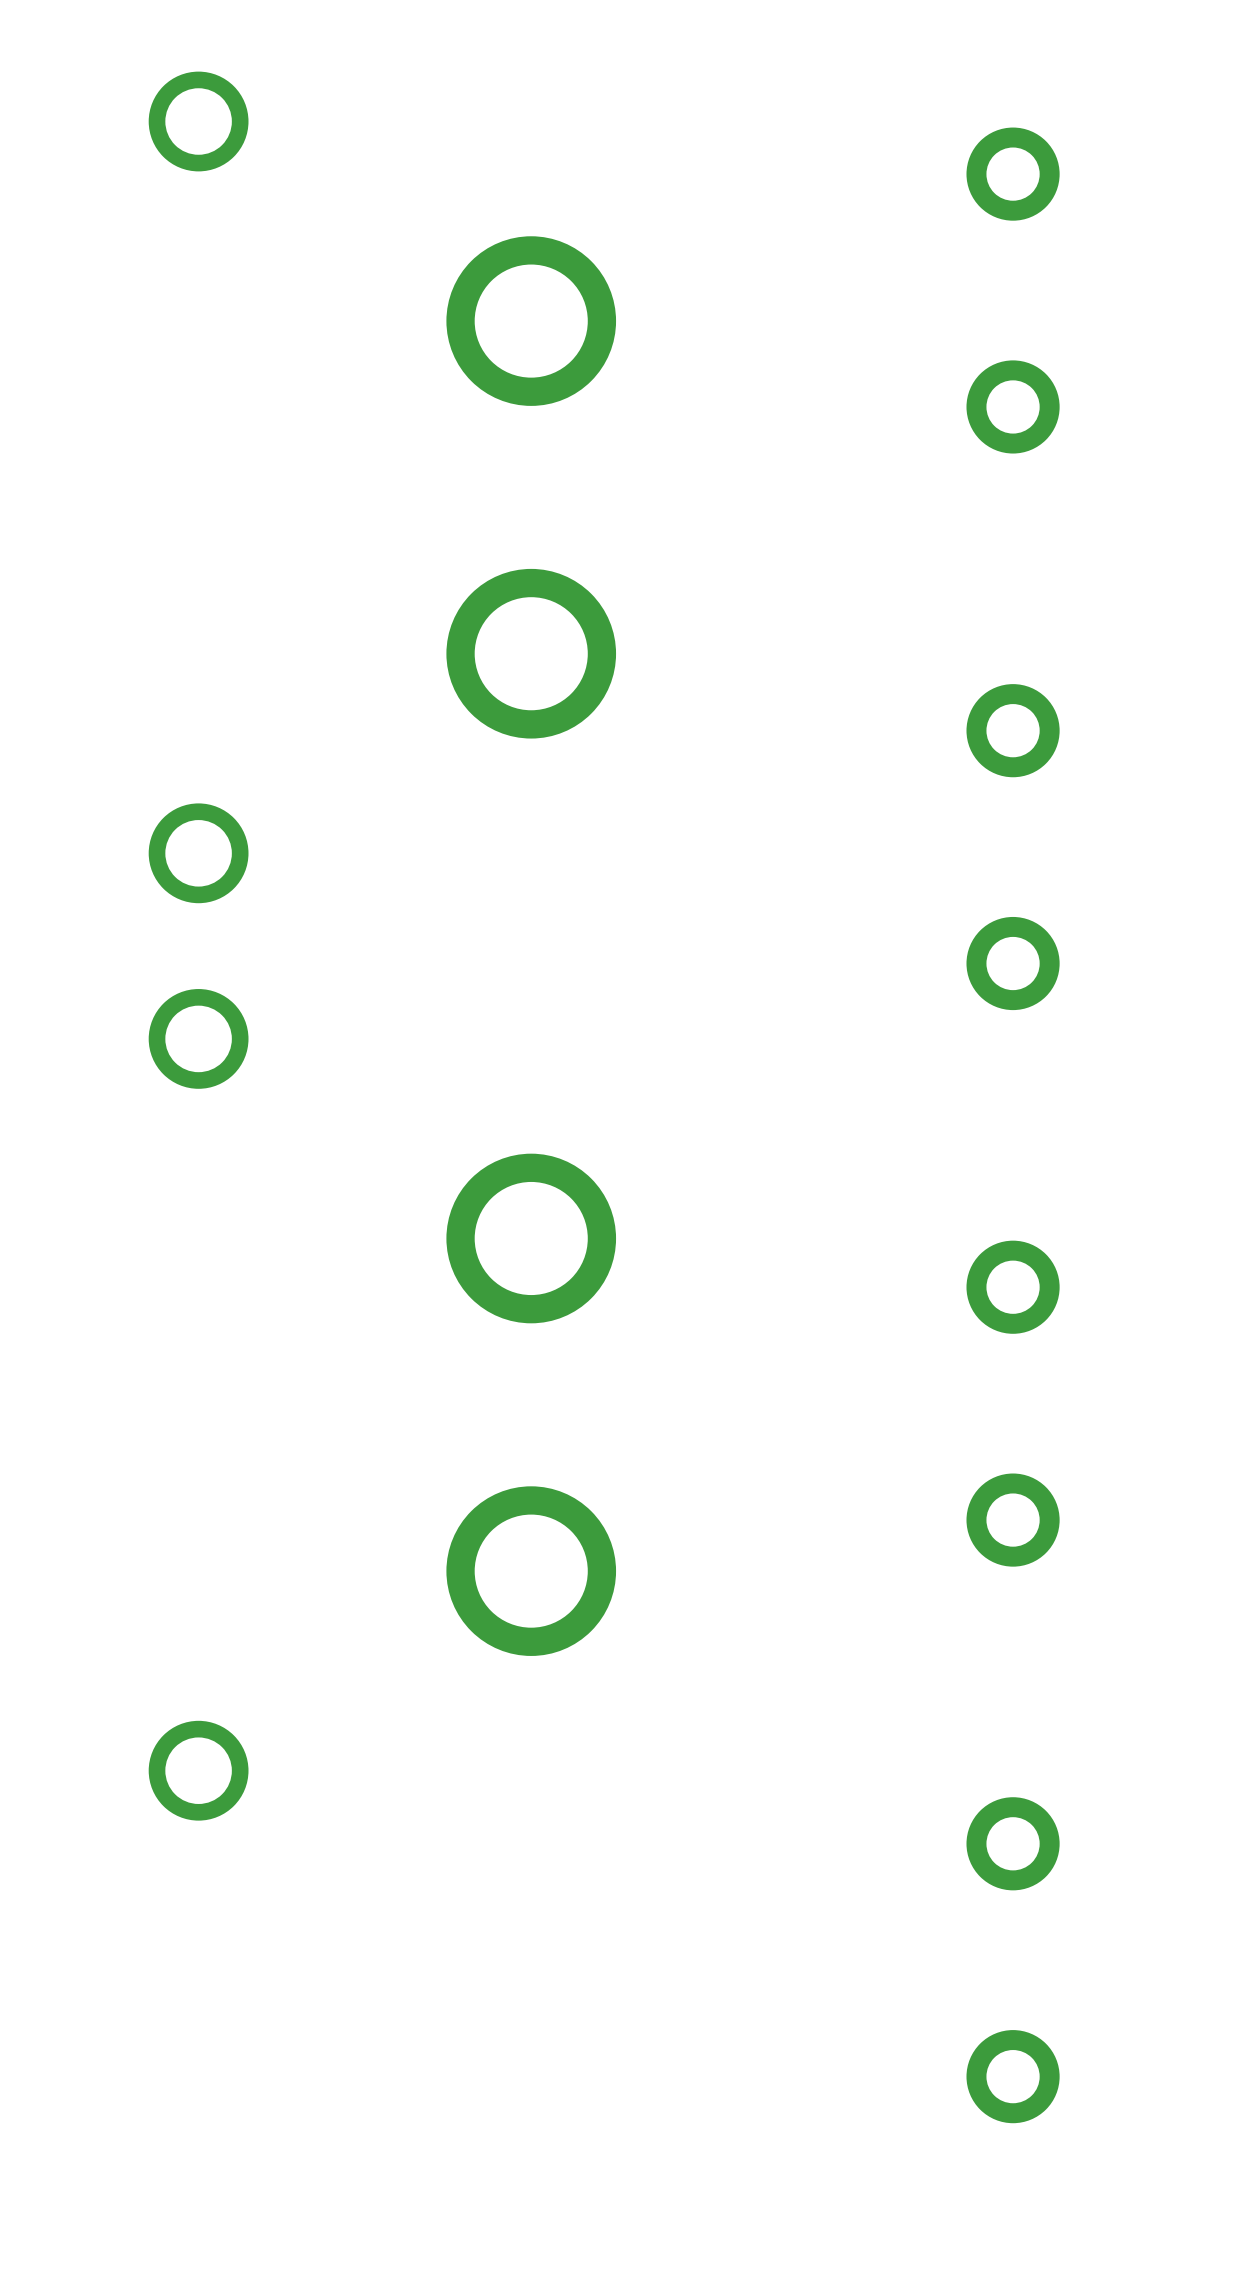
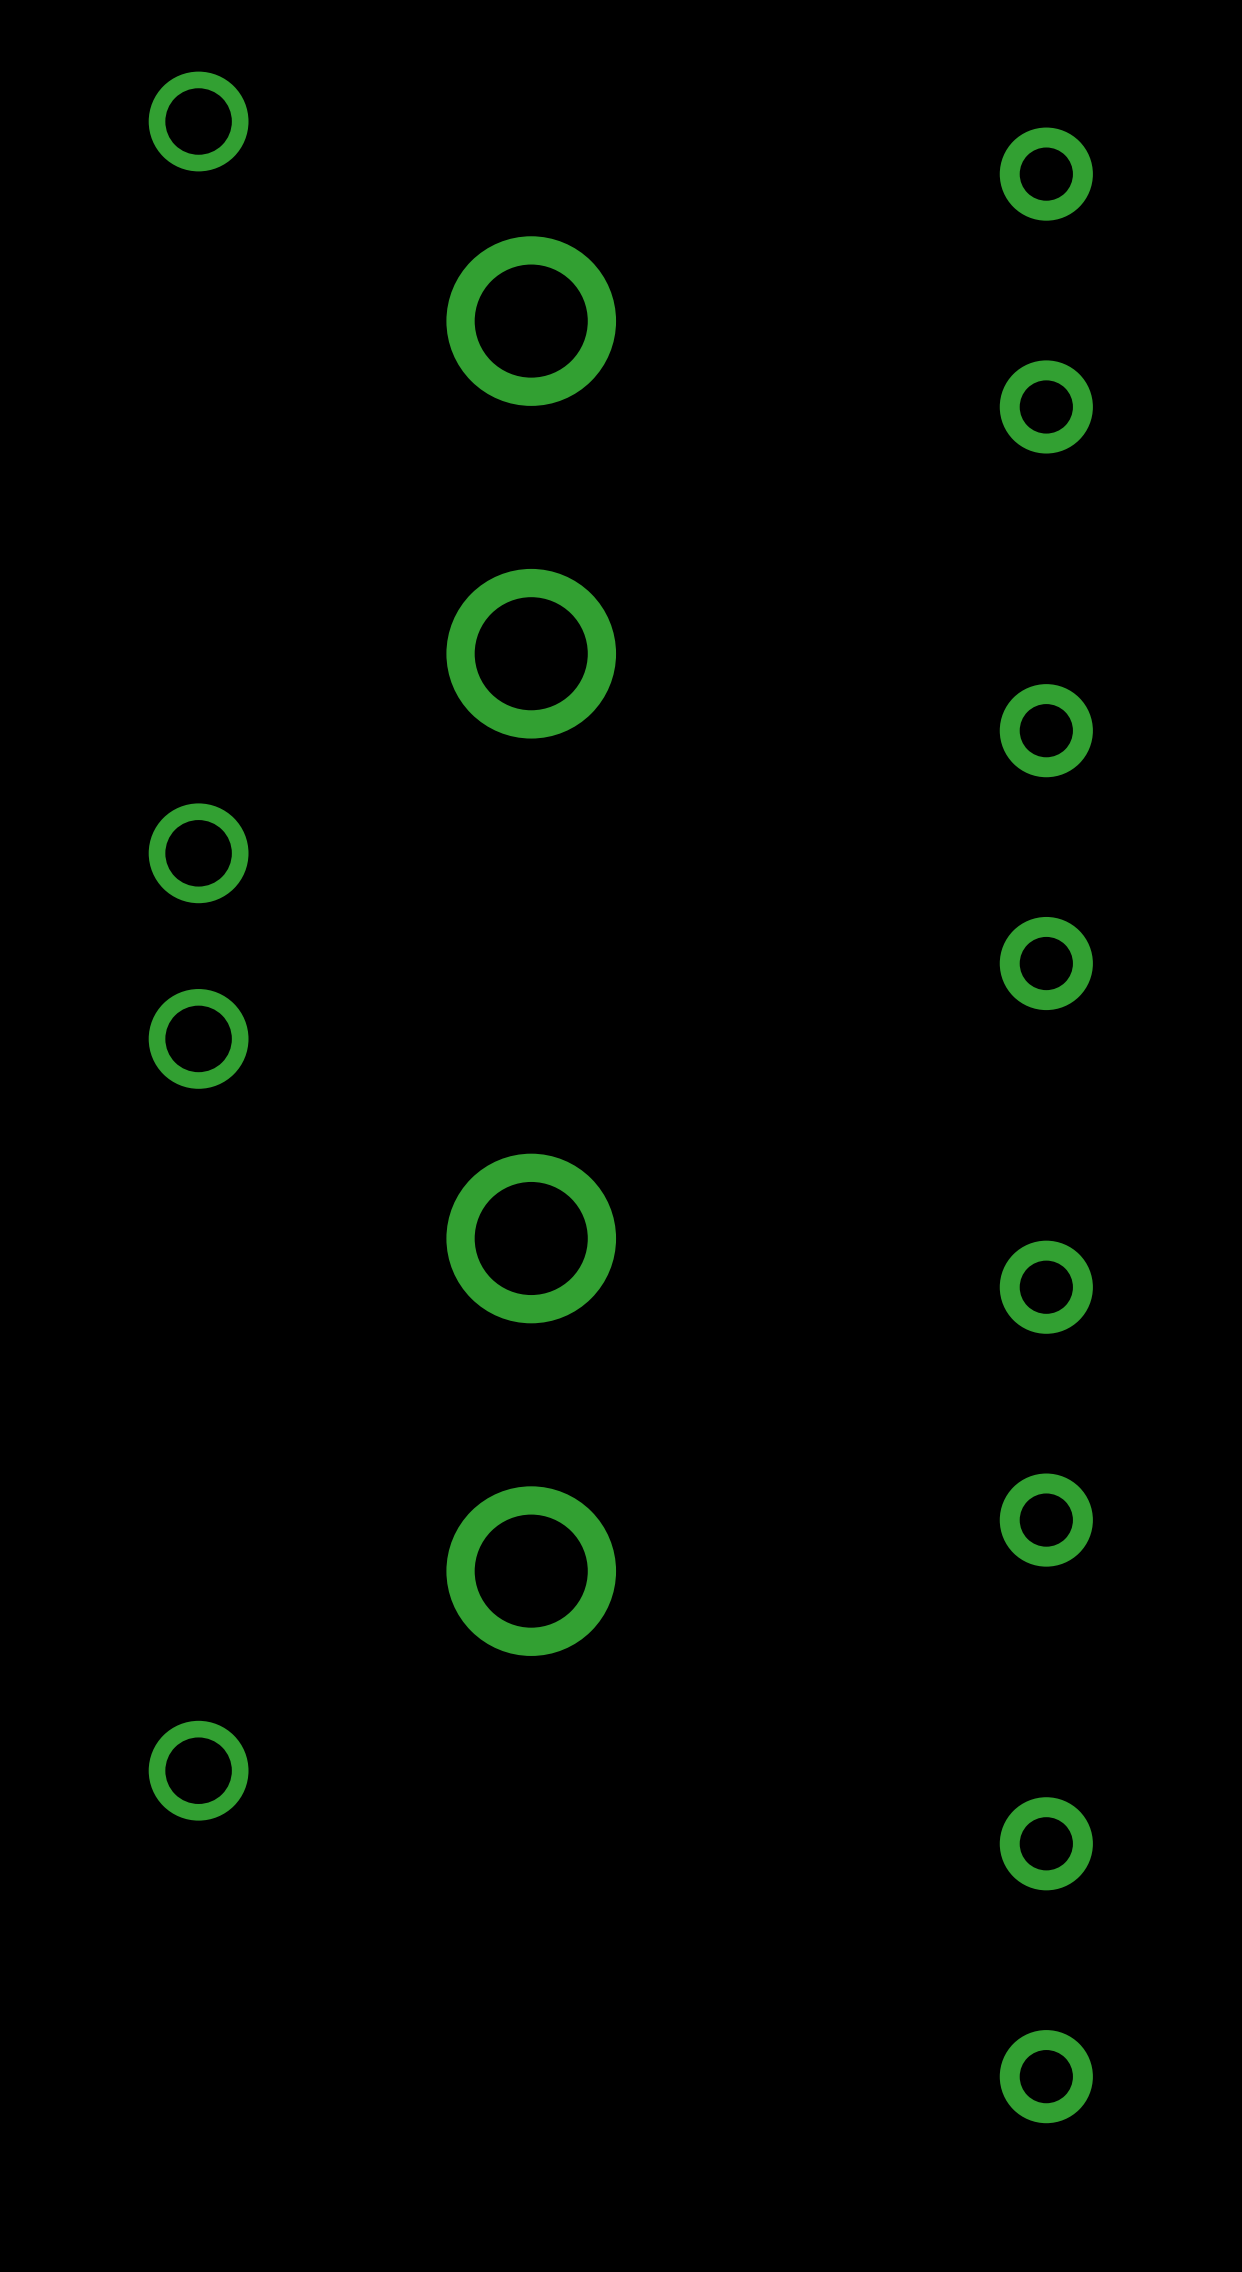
part position: (1013, 290) -> (1046, 290)
part position: (1013, 847) -> (1046, 847)
part position: (1013, 1403) -> (1046, 1403)
part position: (1013, 1960) -> (1046, 1960)

